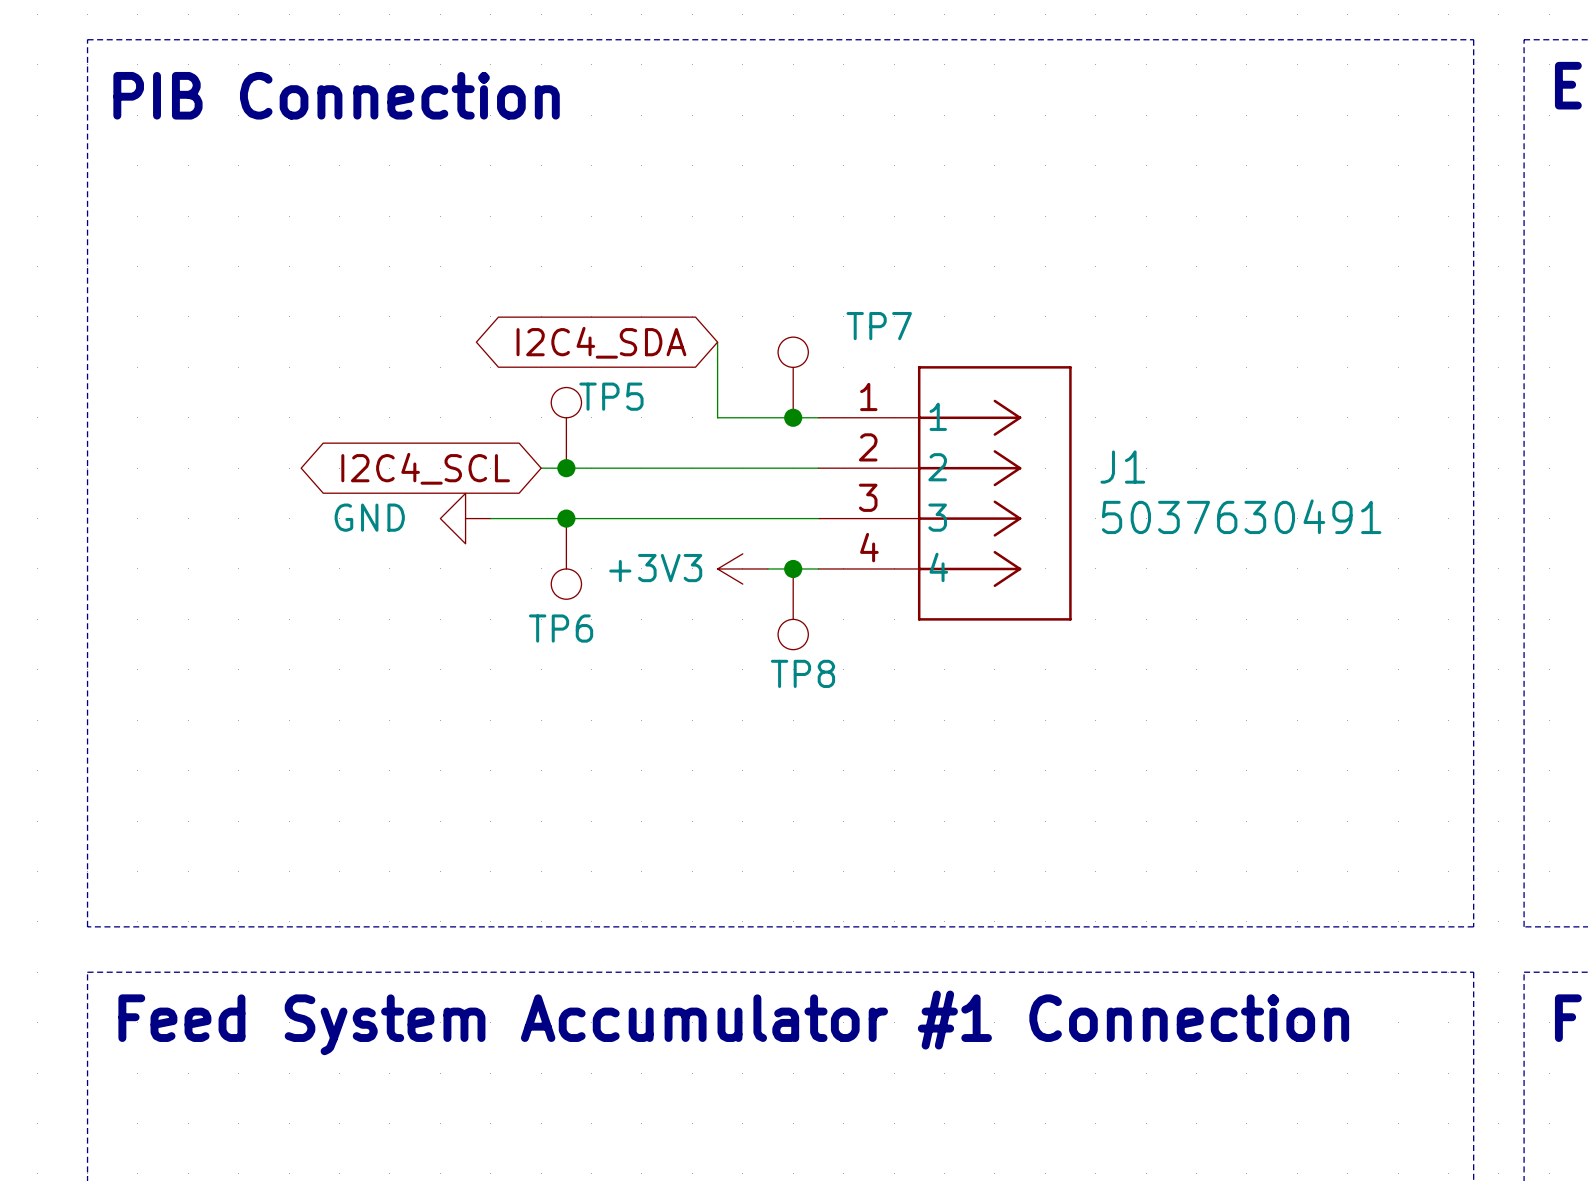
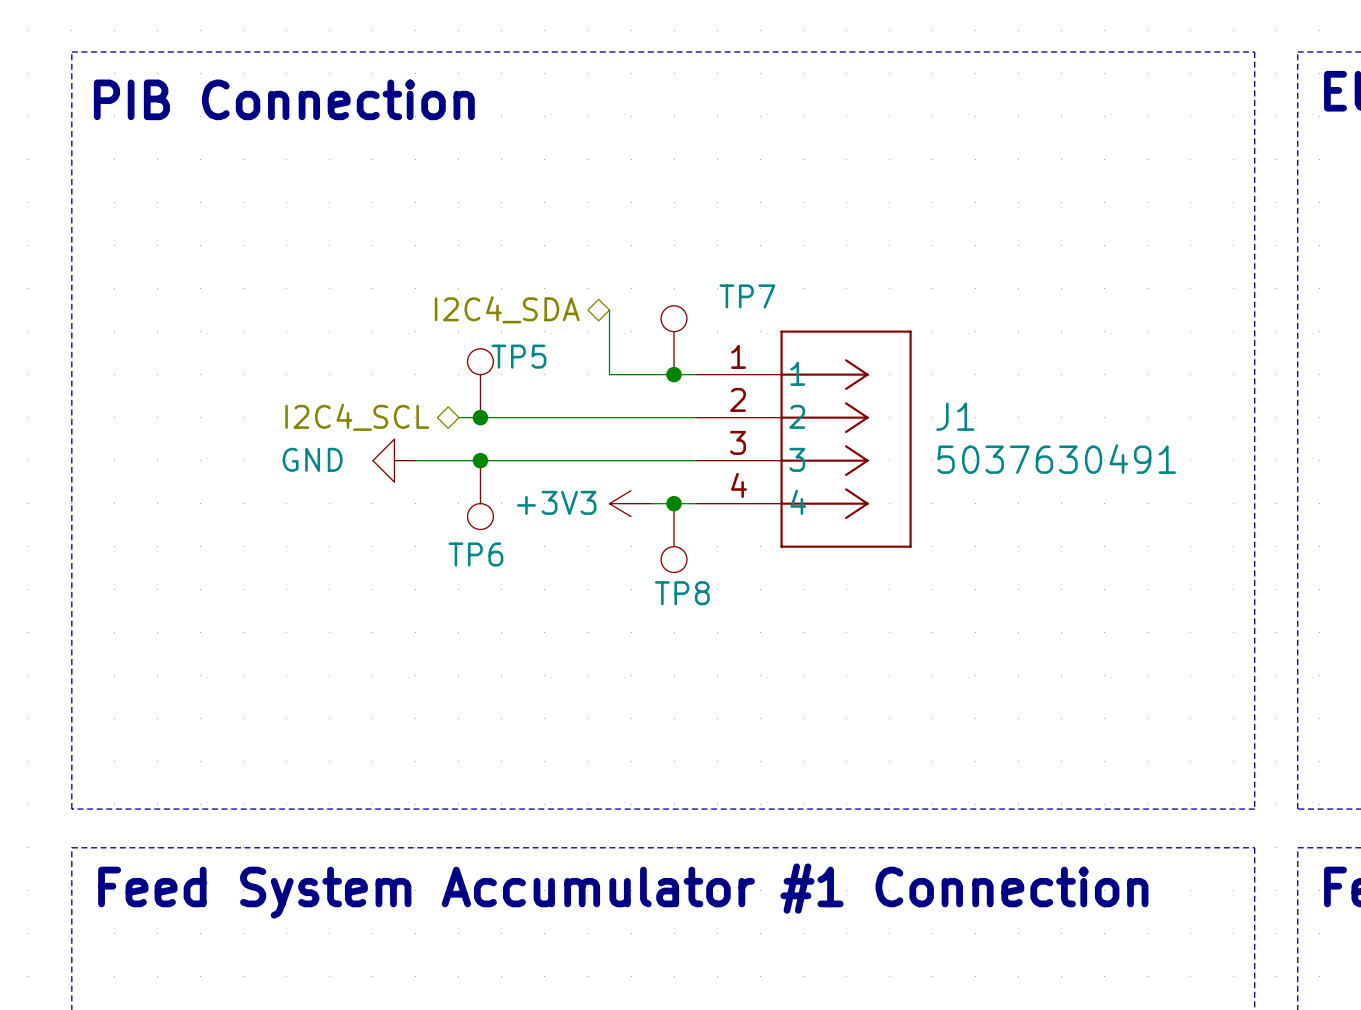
hierarchical label: none -> I2C4_SDA (507, 309)
global label: I2C4_SDA (601, 342) -> none
hierarchical label: none -> I2C4_SCL (357, 417)
global label: I2C4_SCL (425, 468) -> none

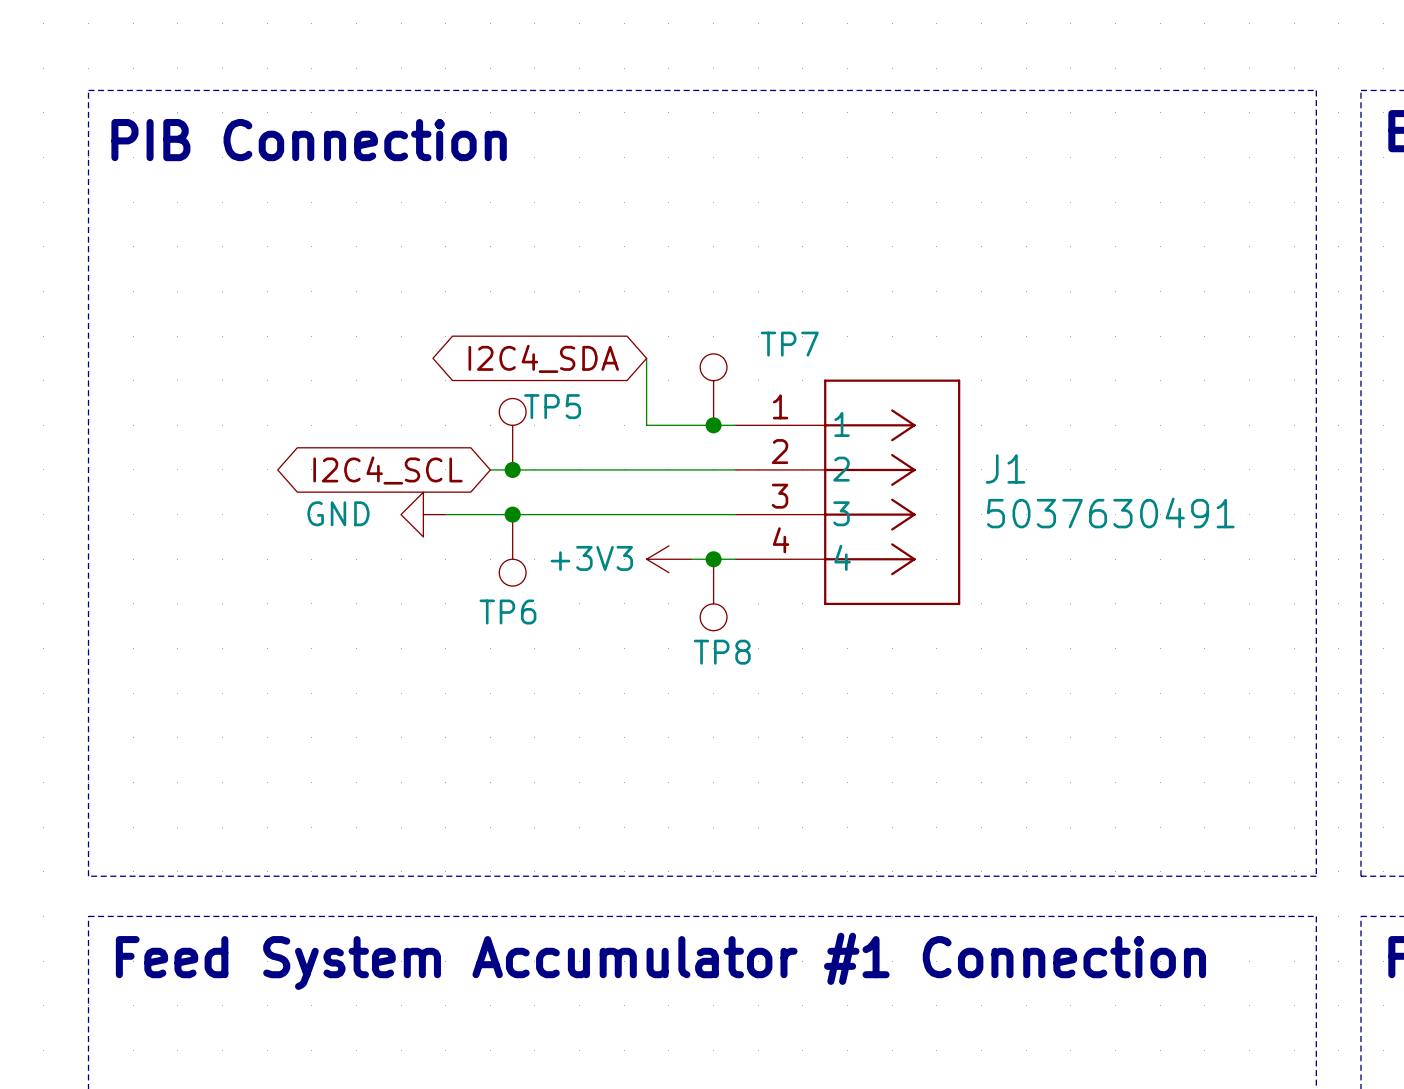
hierarchical label: I2C4_SDA (507, 309) -> none
global label: none -> I2C4_SDA (543, 358)
hierarchical label: I2C4_SCL (357, 417) -> none
global label: none -> I2C4_SCL (387, 470)

